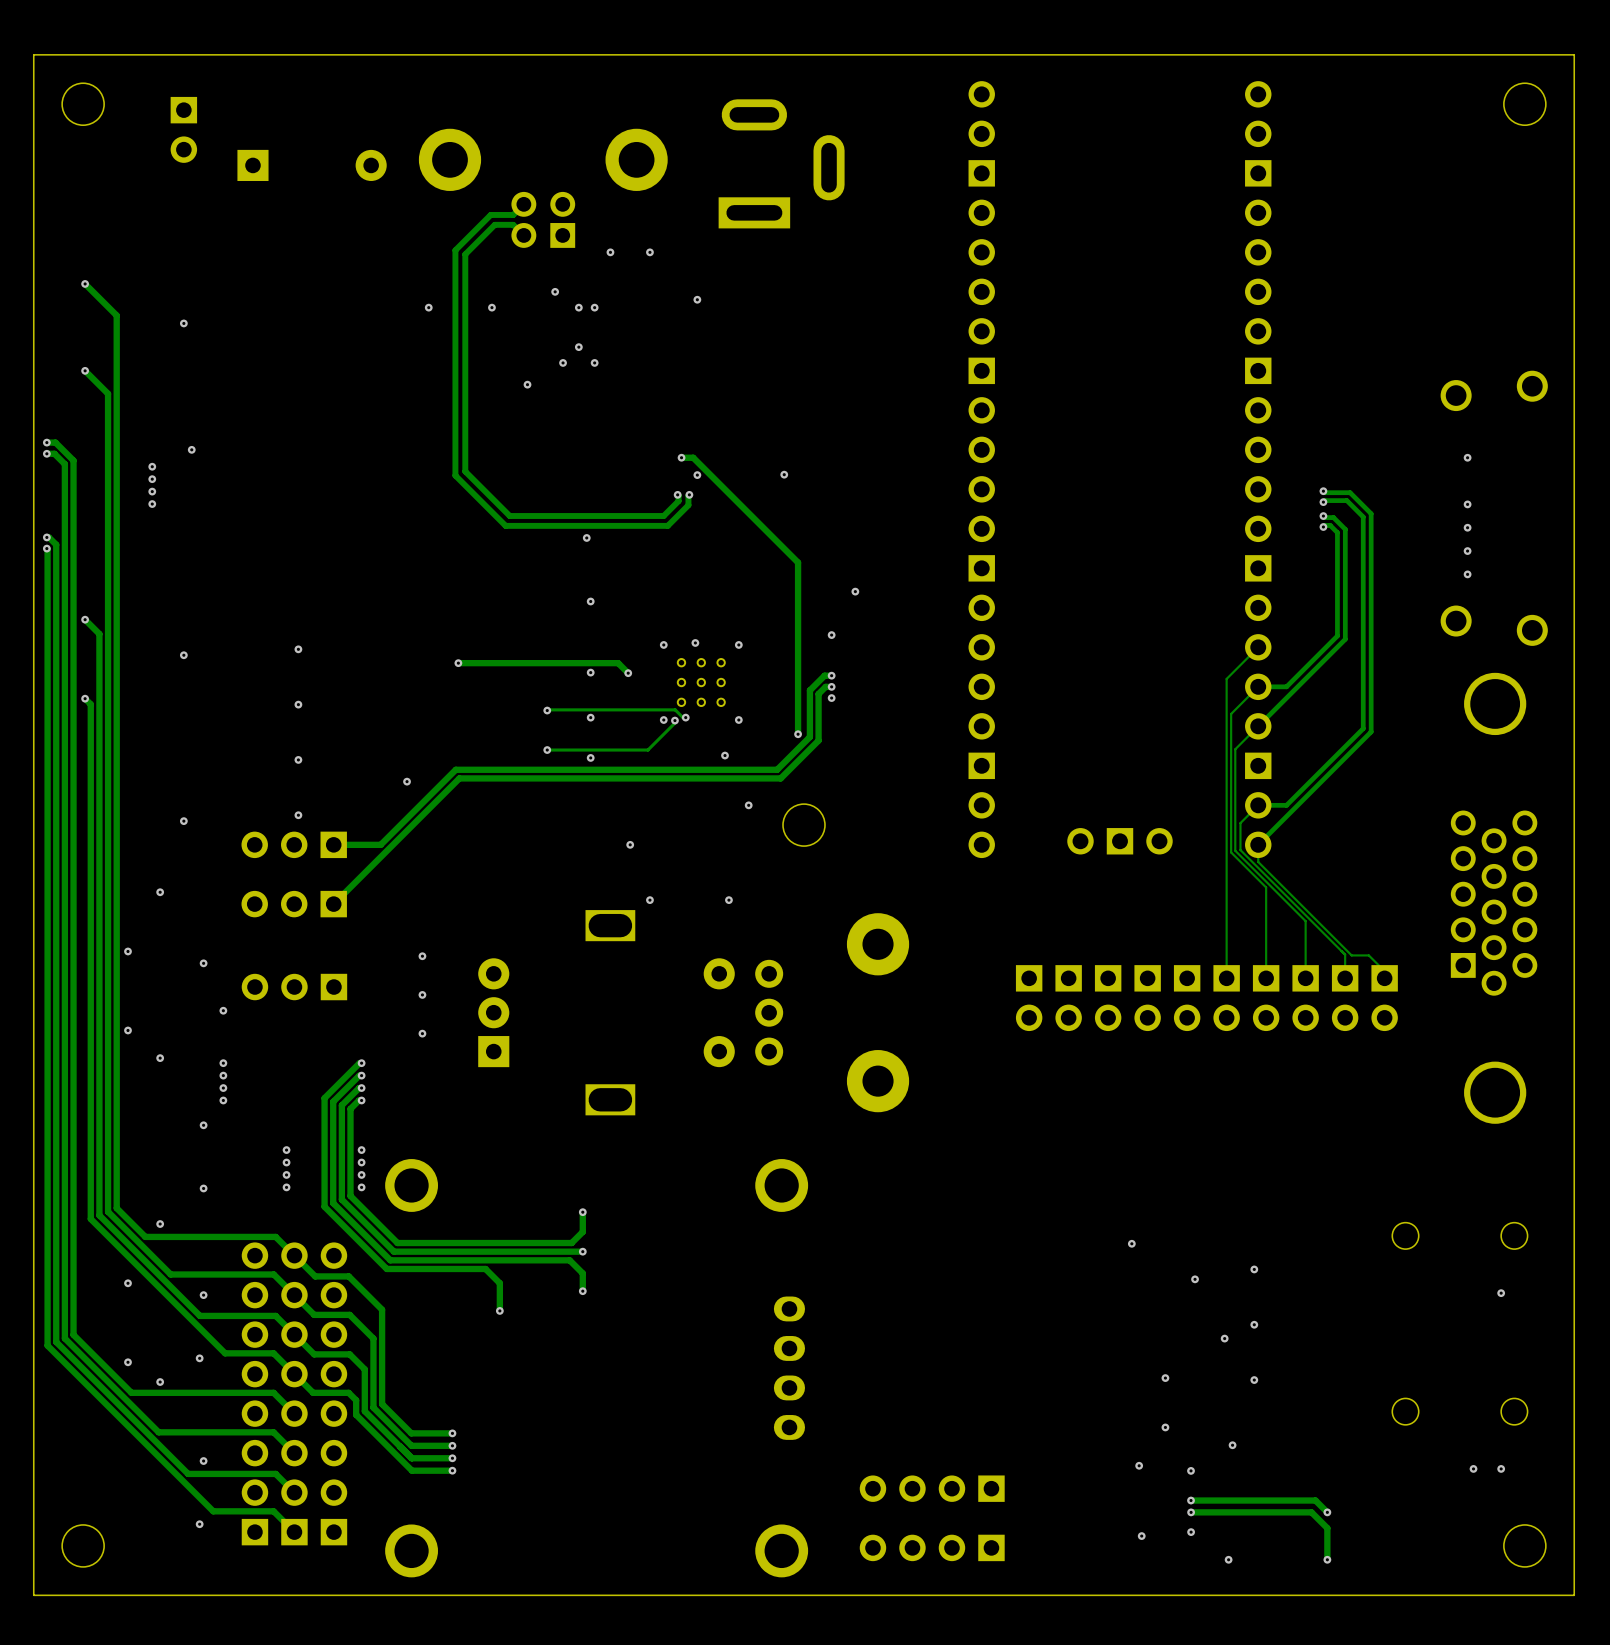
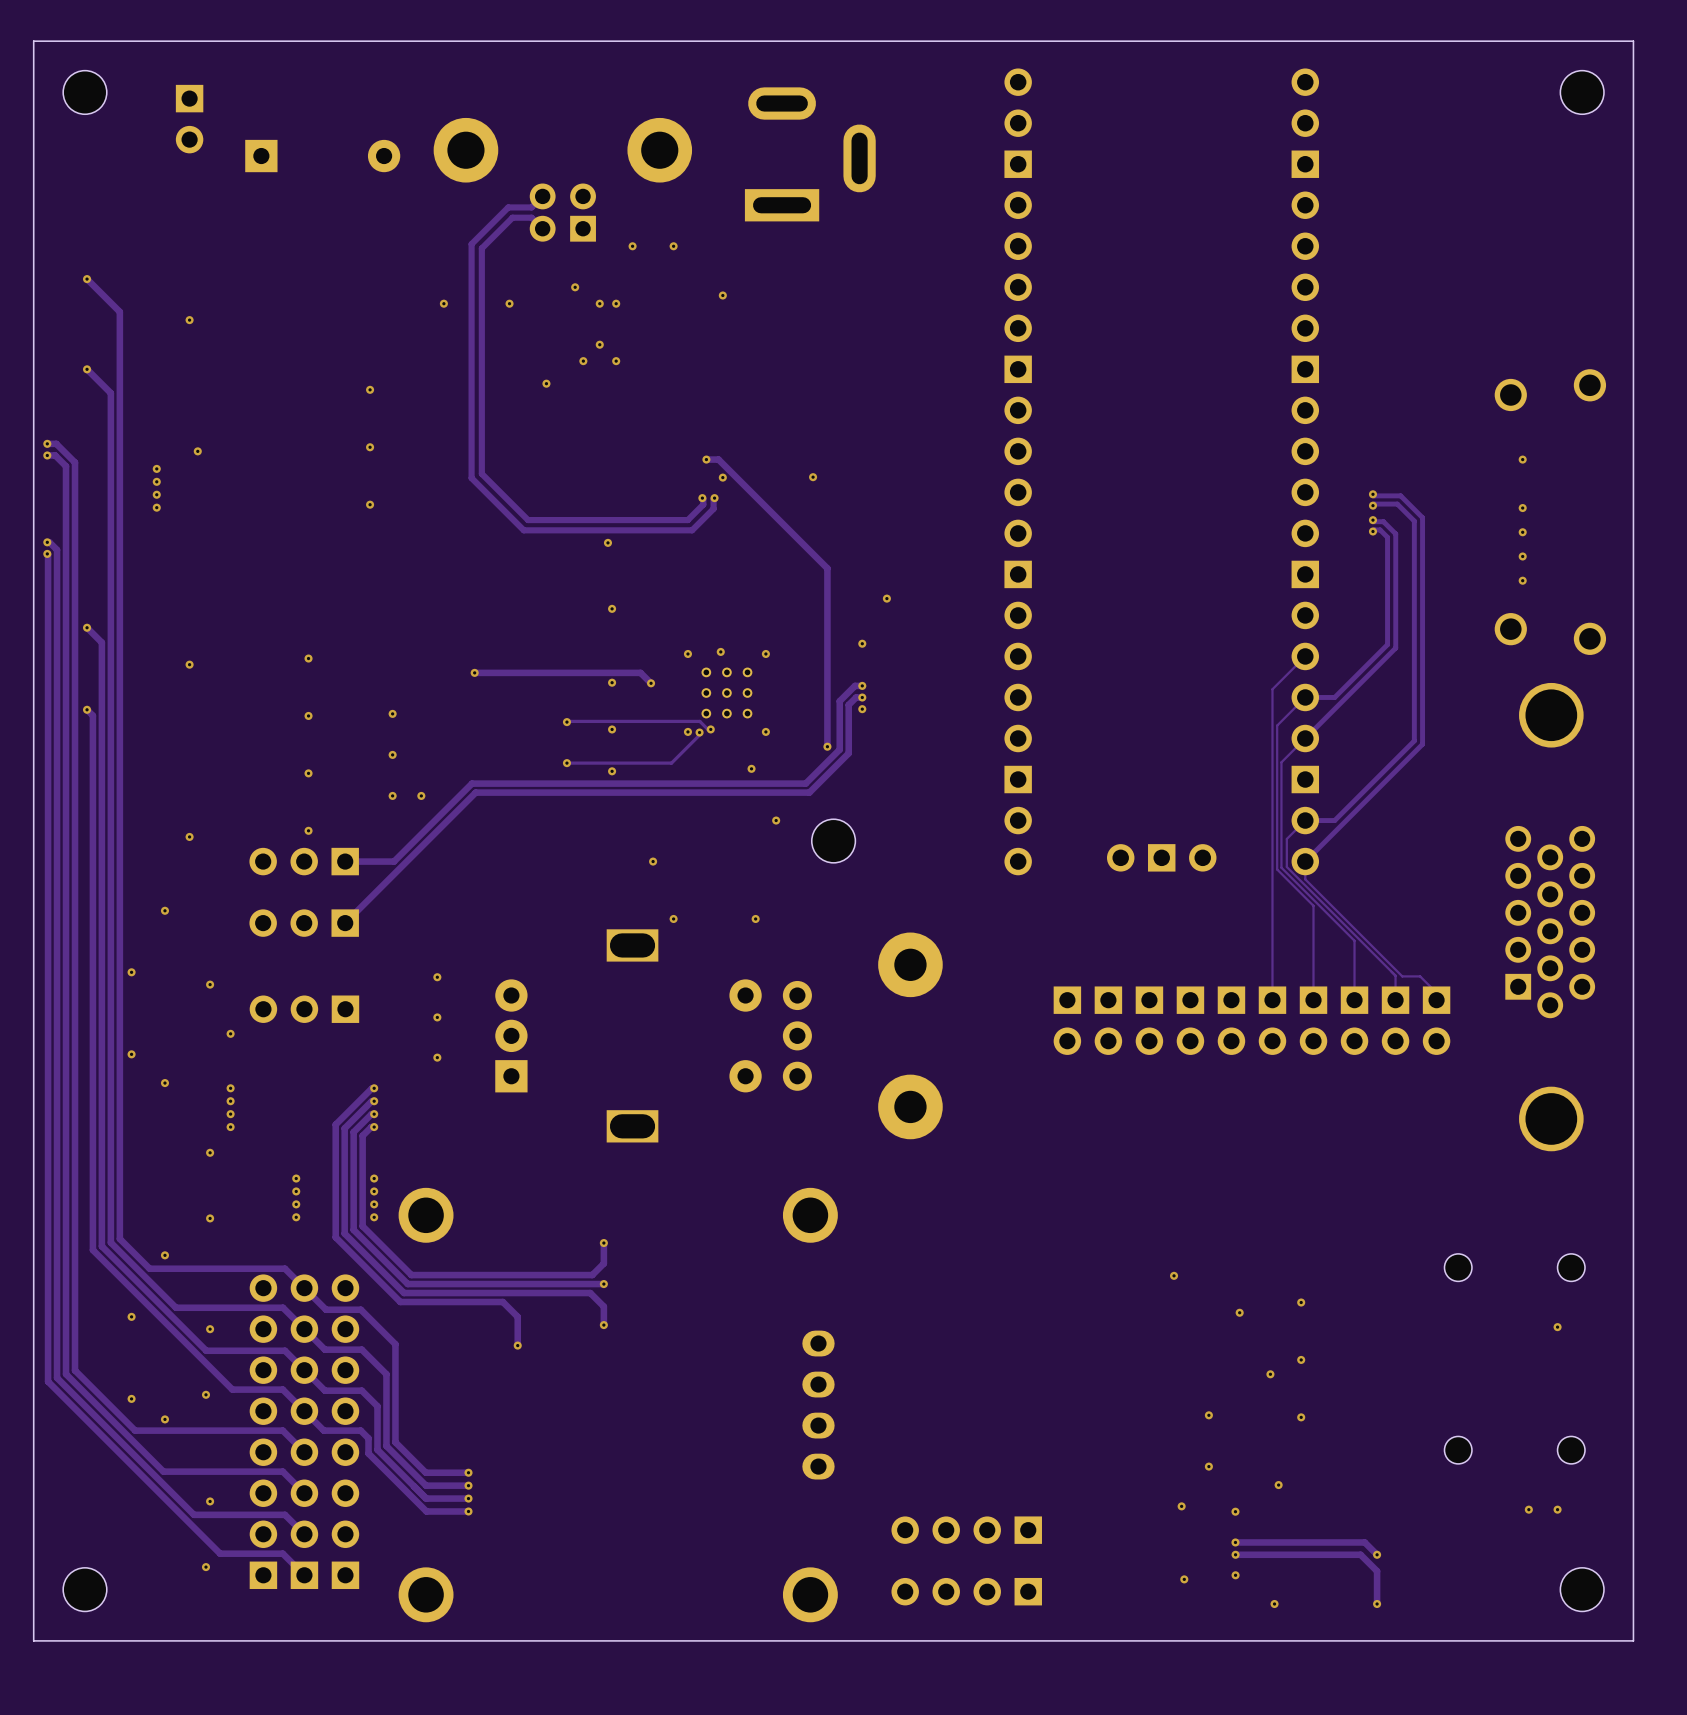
via: none -> (370, 389)
via: none -> (370, 447)
via: none -> (370, 504)
via: none -> (392, 713)
via: none -> (392, 754)
via: none -> (392, 795)

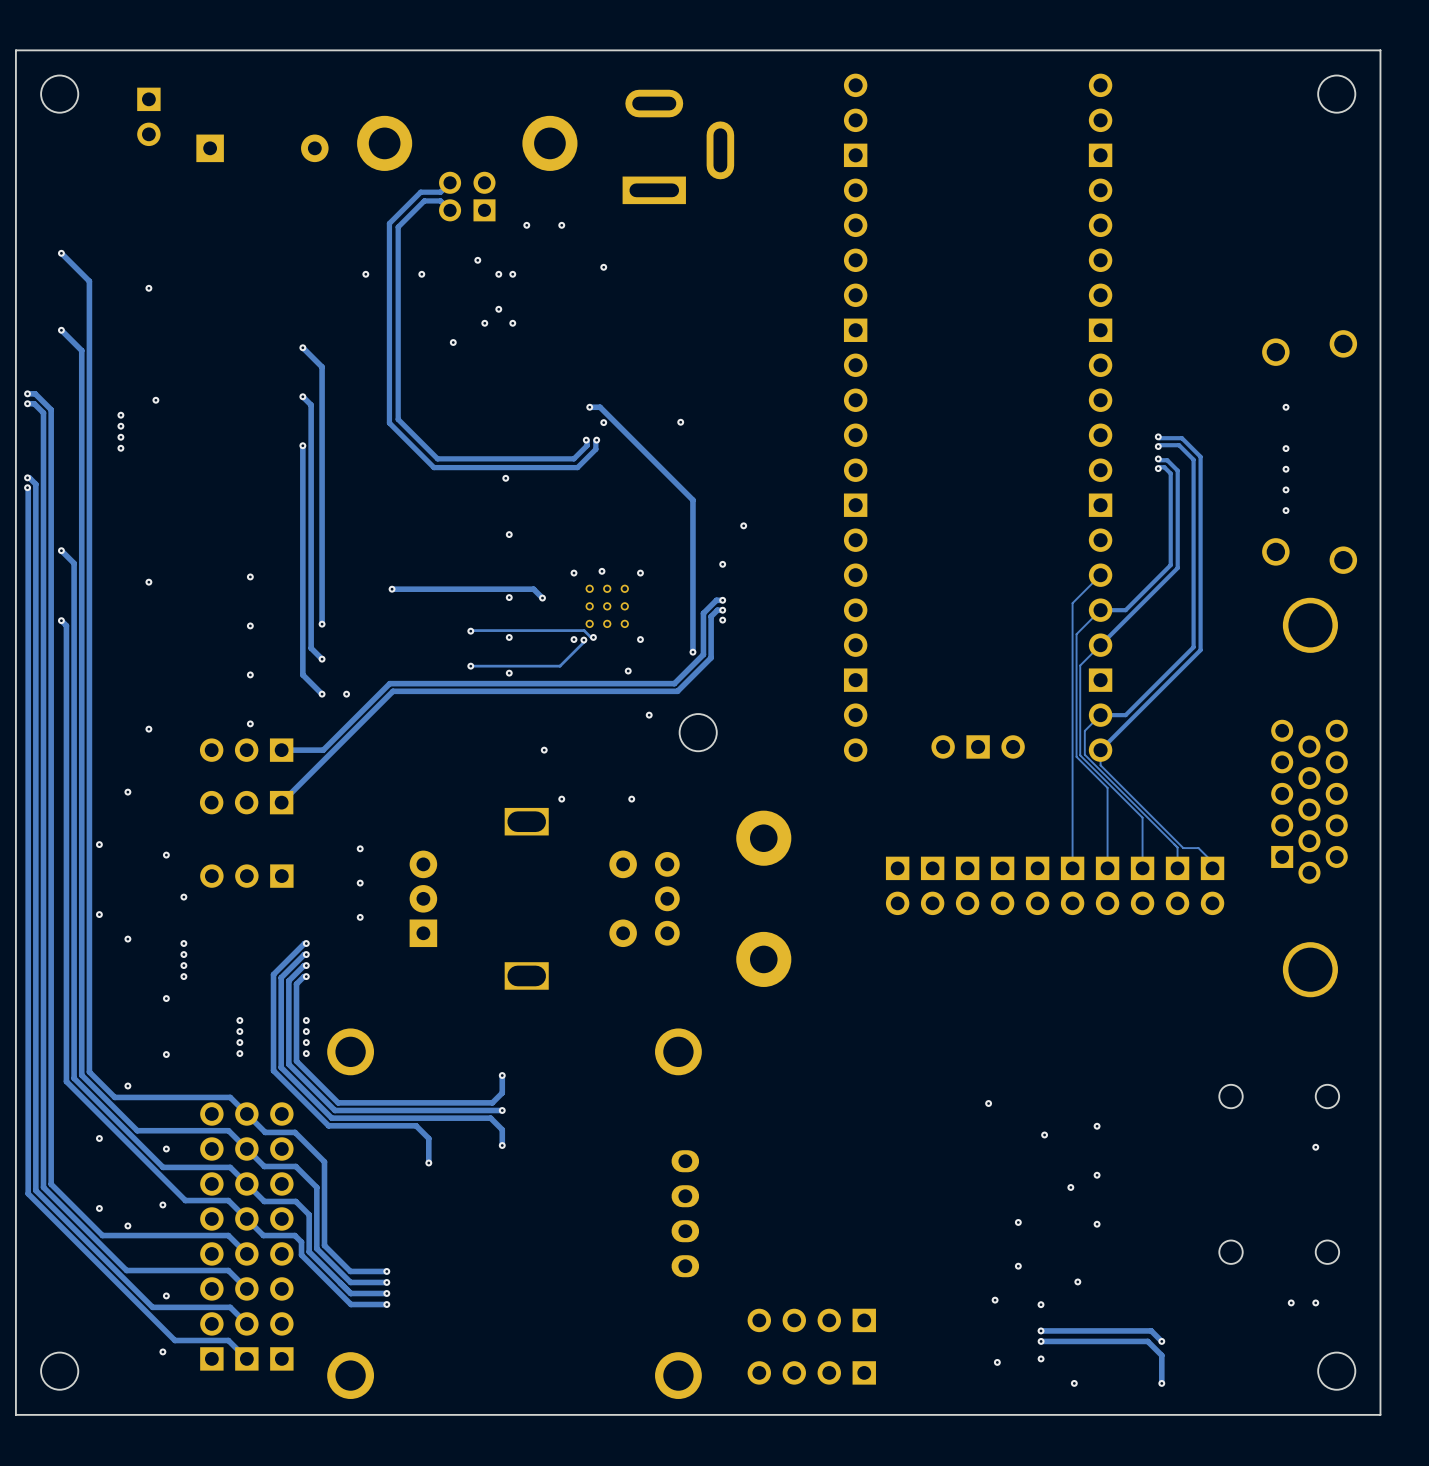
track: none -> (302, 347) (322, 367) (322, 624)
track: none -> (302, 396) (311, 405) (311, 648) (322, 659)
track: none -> (302, 445) (302, 674) (322, 694)

